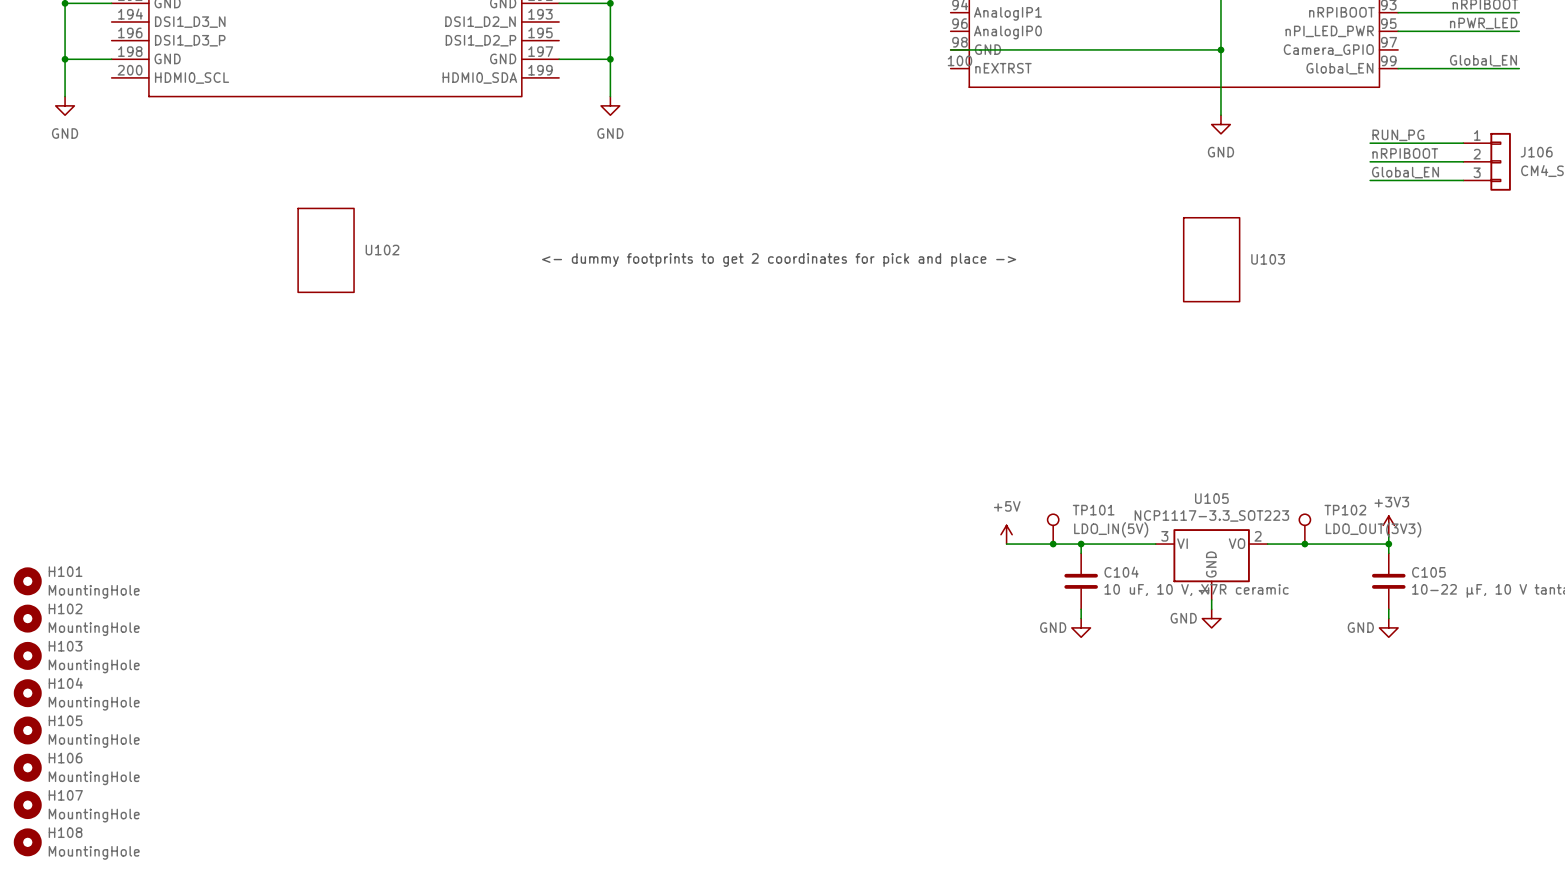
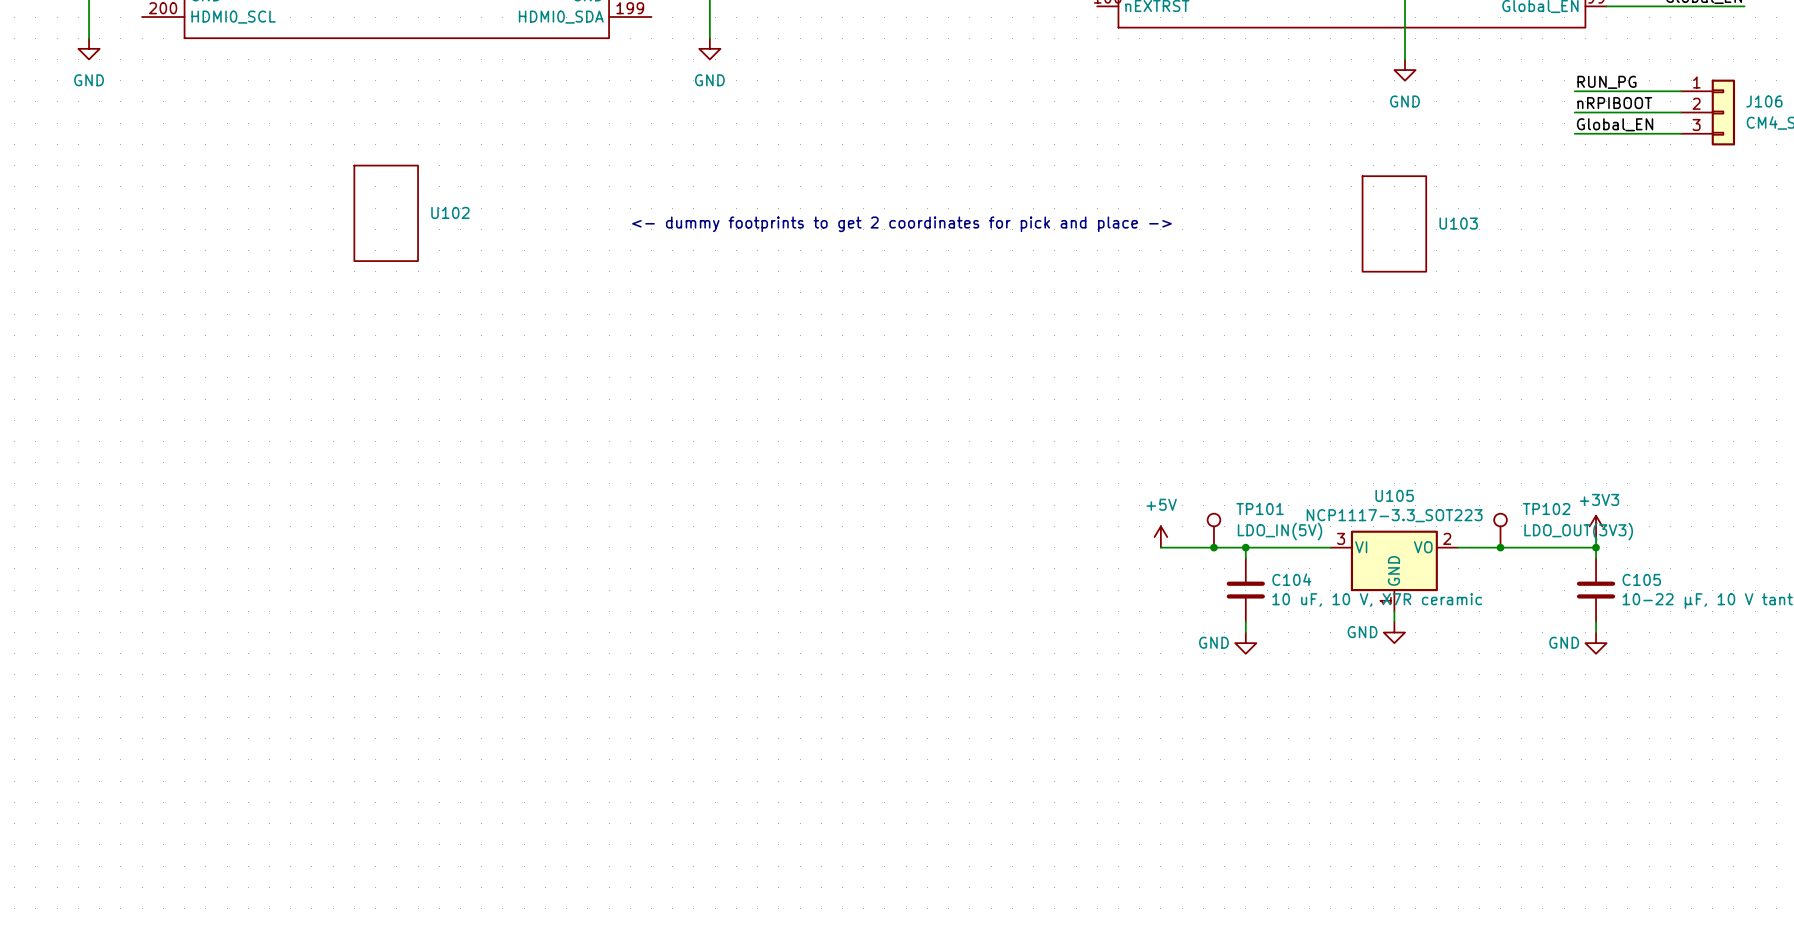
H101: MountingHole (27, 581) -> none
H102: MountingHole (27, 618) -> none
H103: MountingHole (27, 655) -> none
H104: MountingHole (27, 693) -> none
H105: MountingHole (27, 730) -> none
H106: MountingHole (27, 767) -> none
H107: MountingHole (27, 805) -> none
H108: MountingHole (27, 842) -> none

